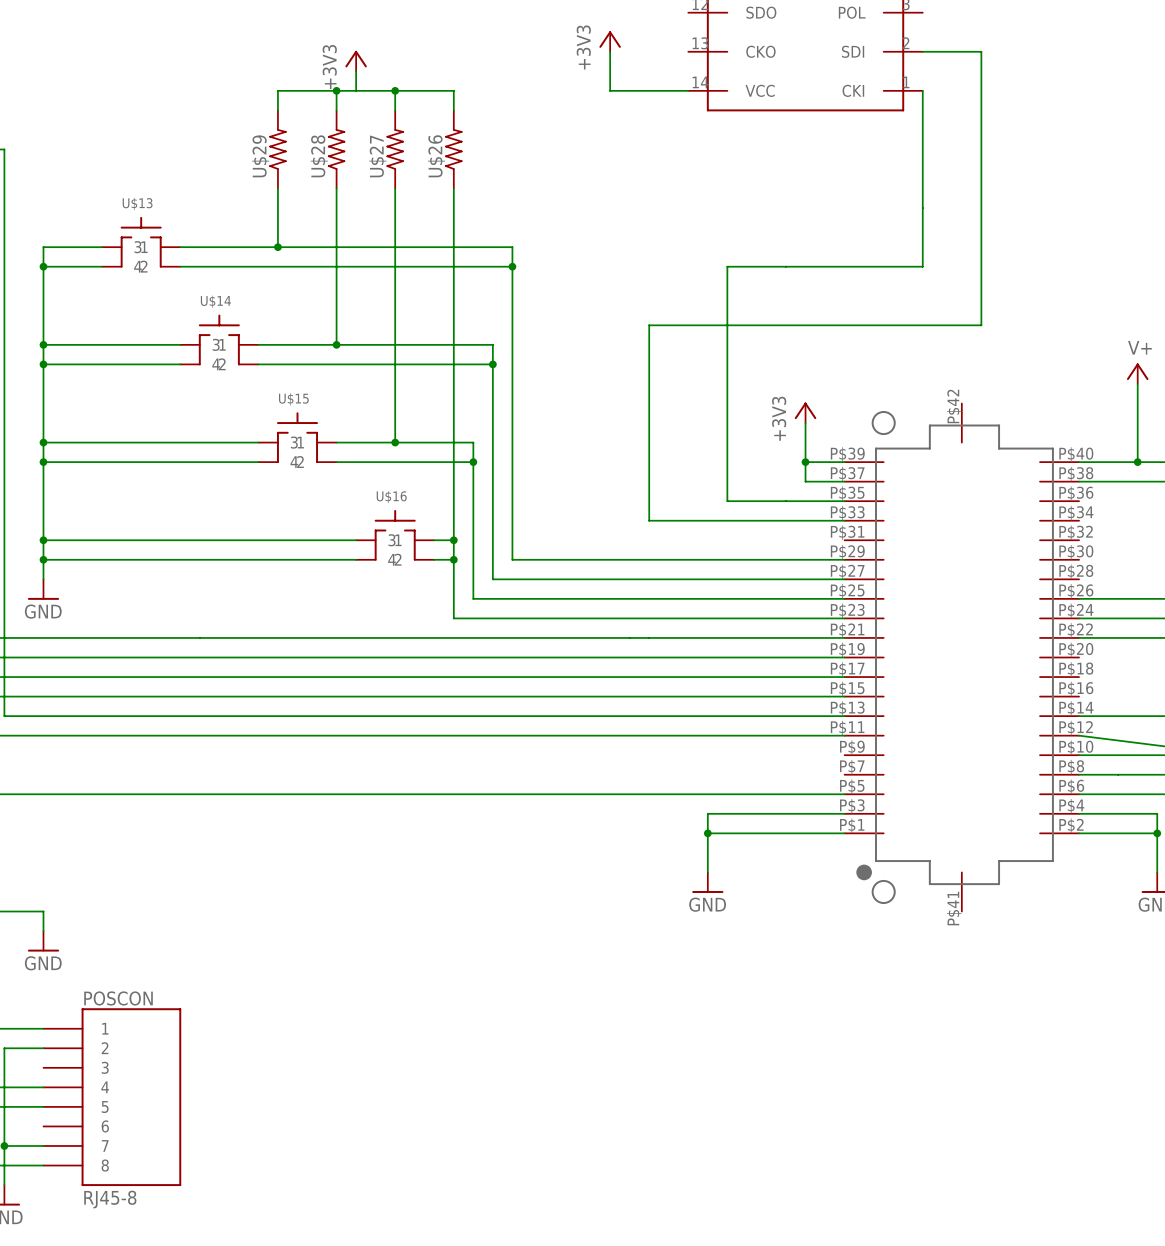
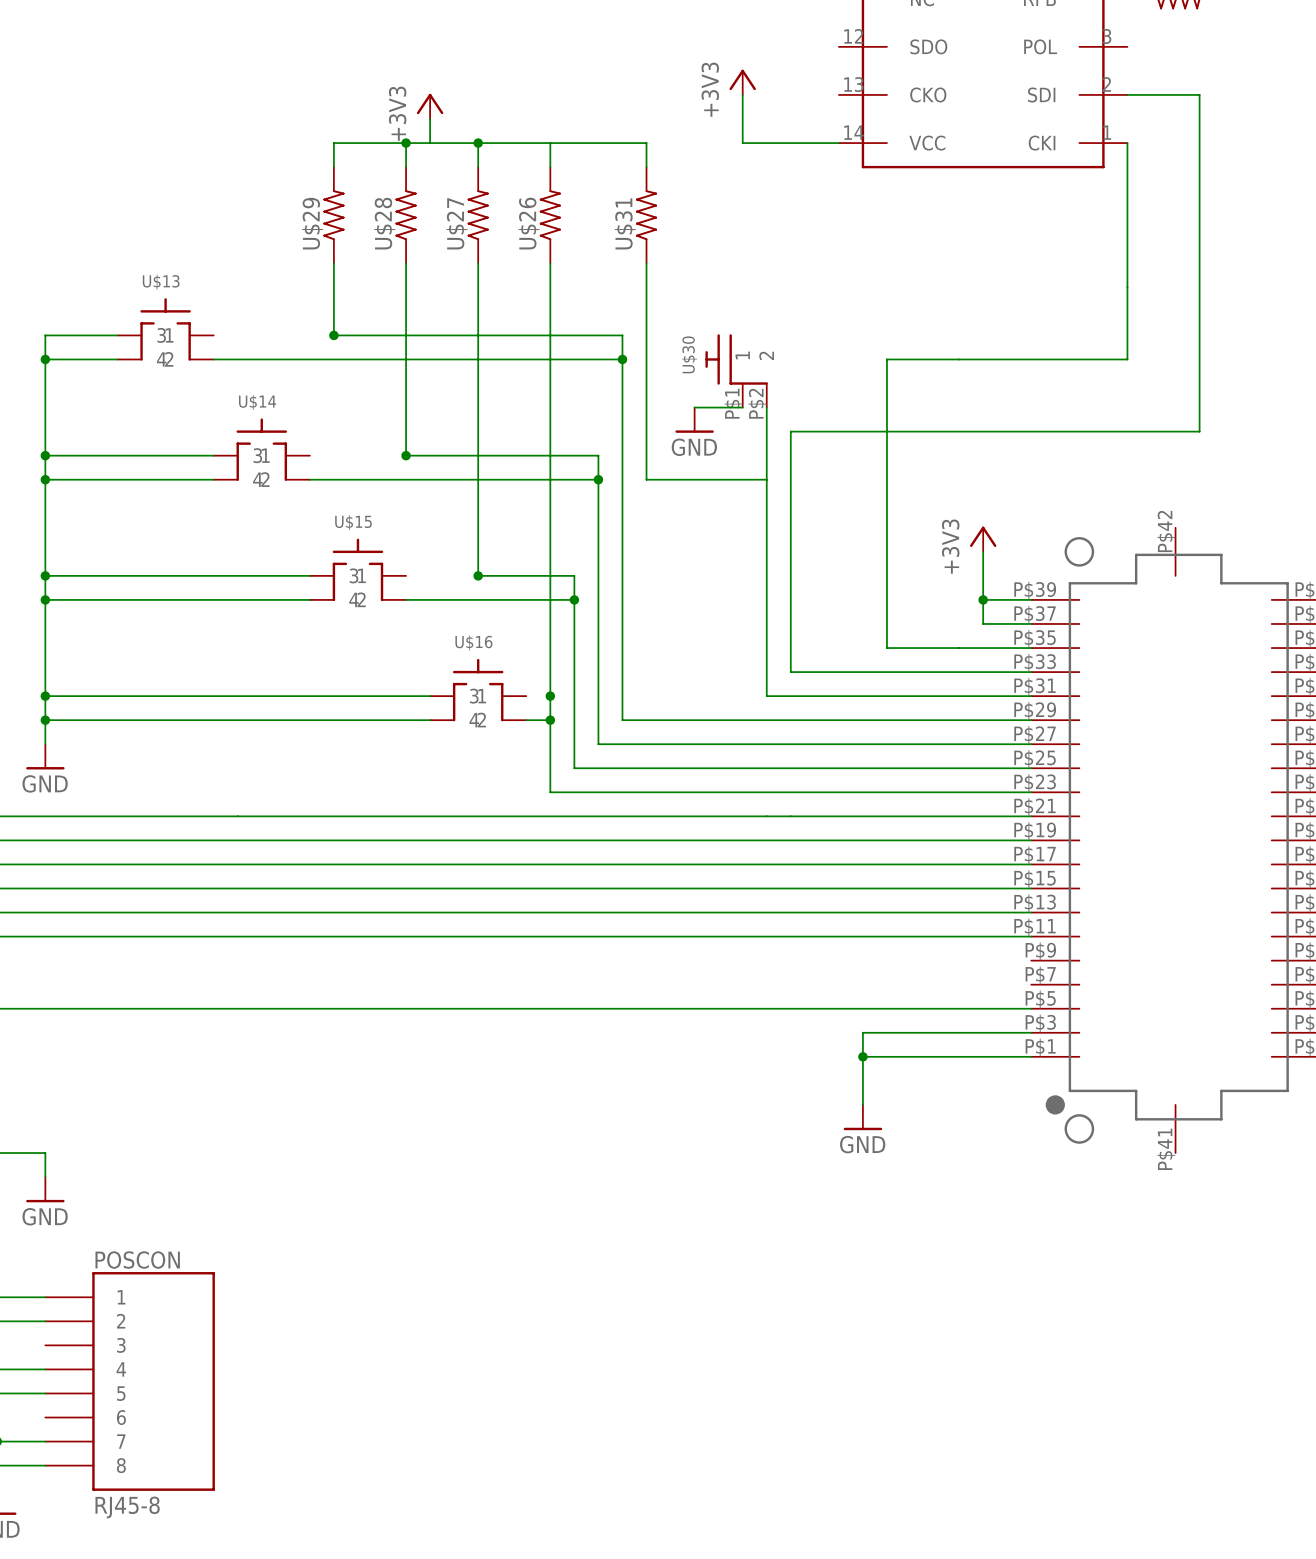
wire: none -> (550, 143) (646, 143) (646, 167)
U$31: none -> (646, 215)
wire: none -> (646, 263) (646, 479) (766, 479)
wire: (180, 247) (277, 247) -> none
U$30: none -> (736, 370)
wire: none -> (694, 407) (742, 407)
wire: none -> (766, 407) (766, 696) (1031, 696)
power symbol: none -> GND (694, 420)
wire: (258, 344) (336, 344) -> none
wire: (336, 442) (395, 442) -> none
wire: (434, 540) (453, 540) -> none

